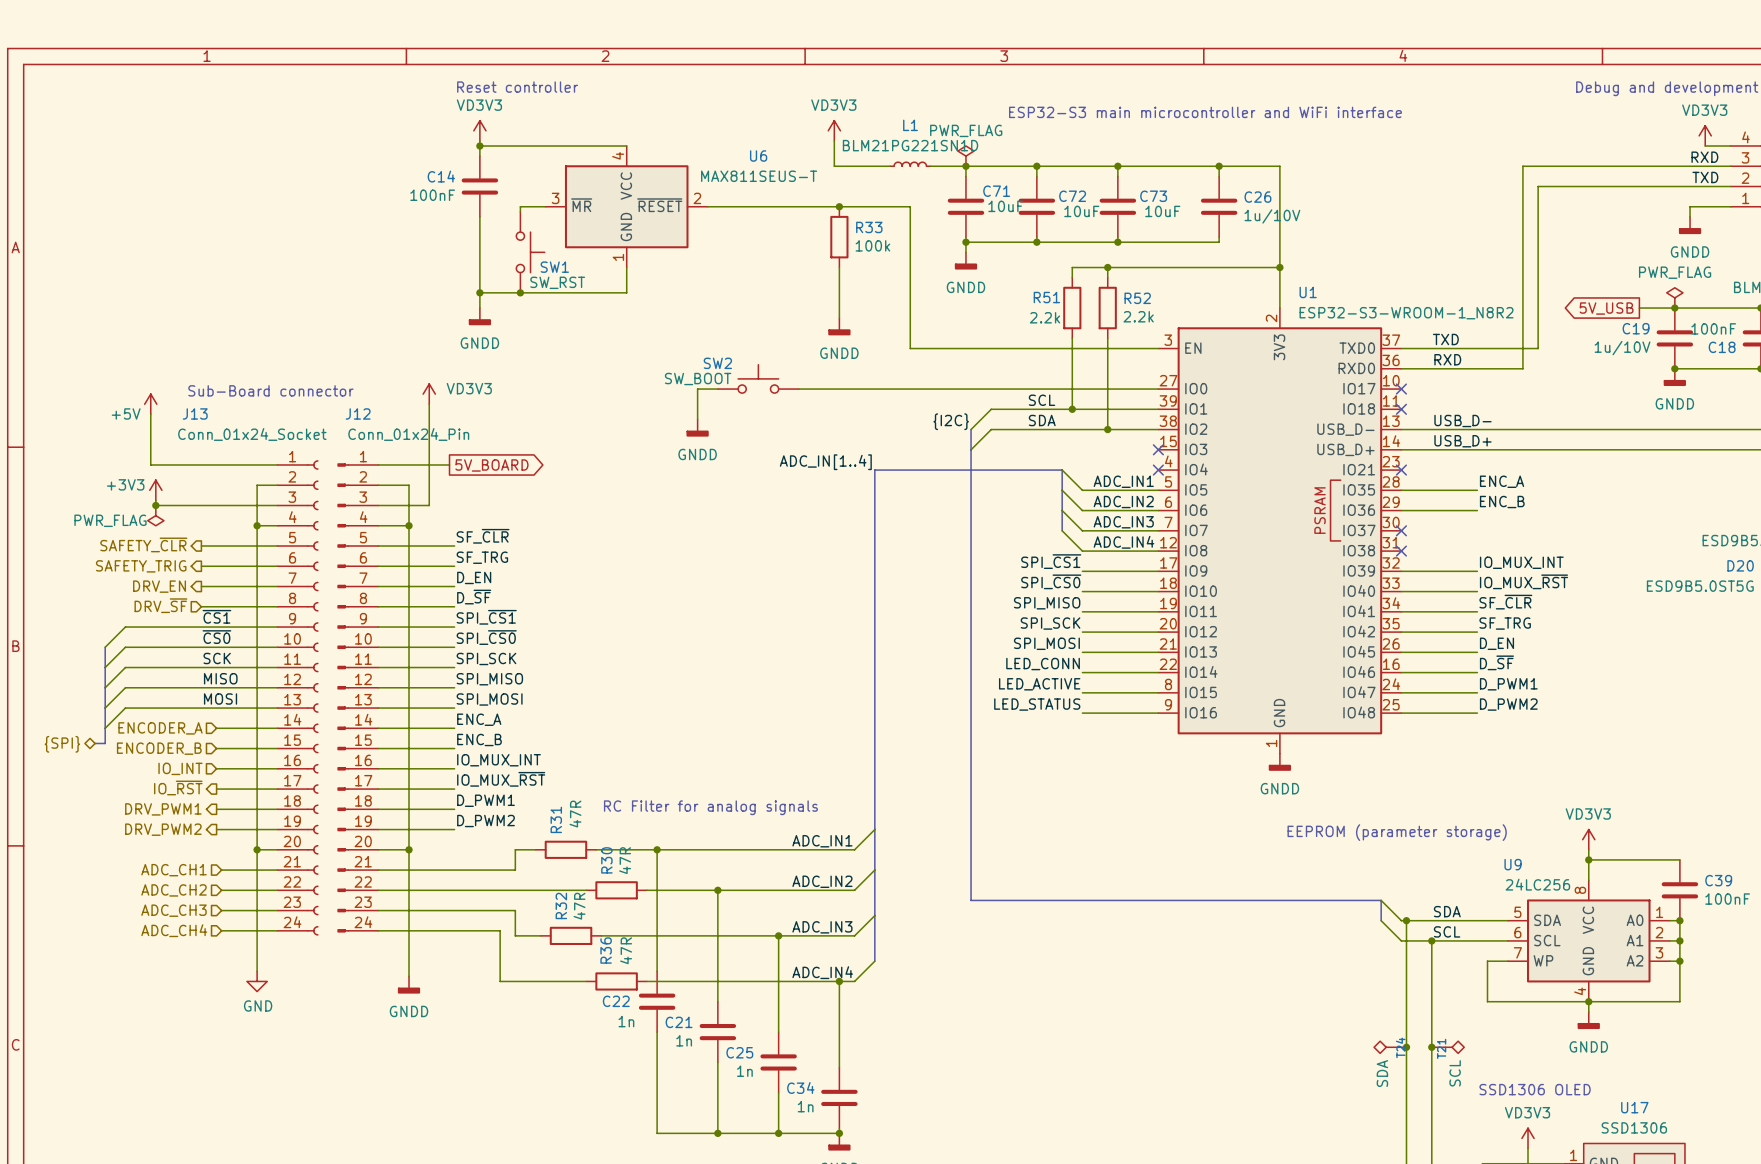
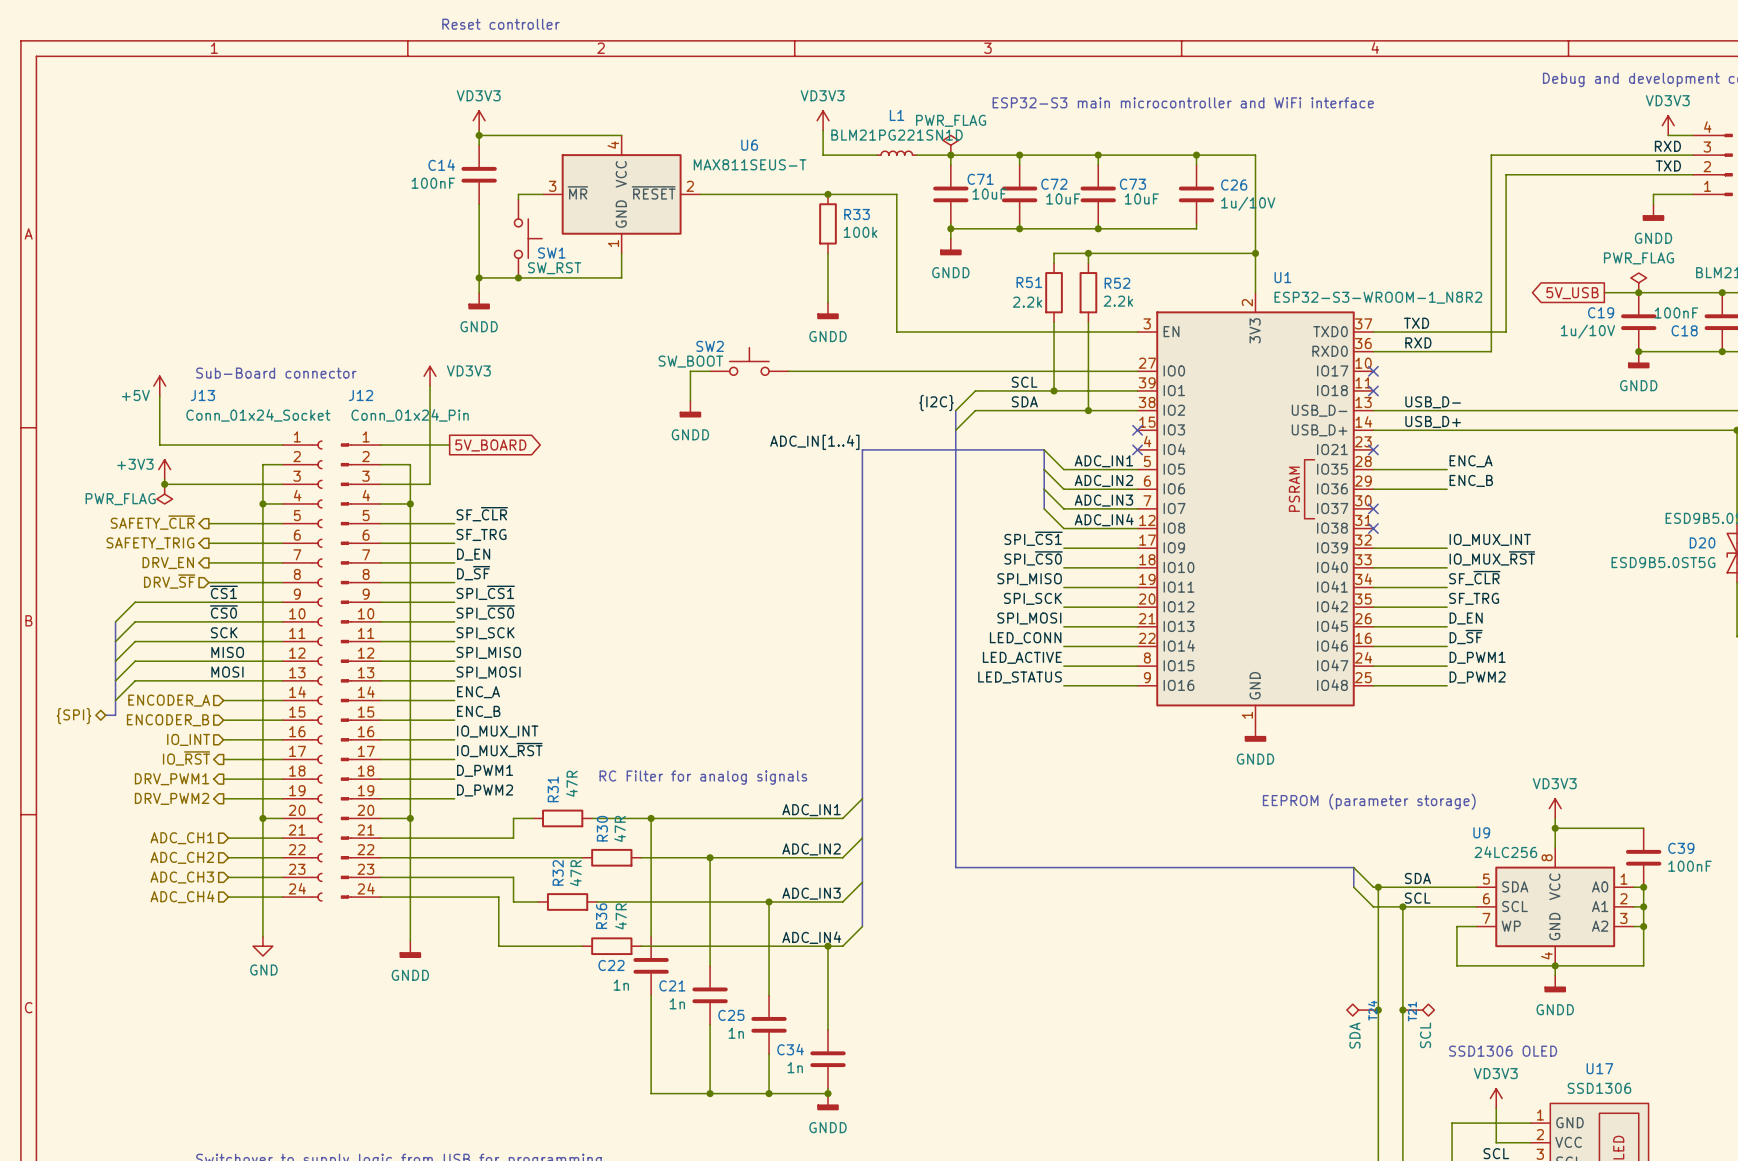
text position: Reset controller (517, 87) -> Reset controller (500, 24)

